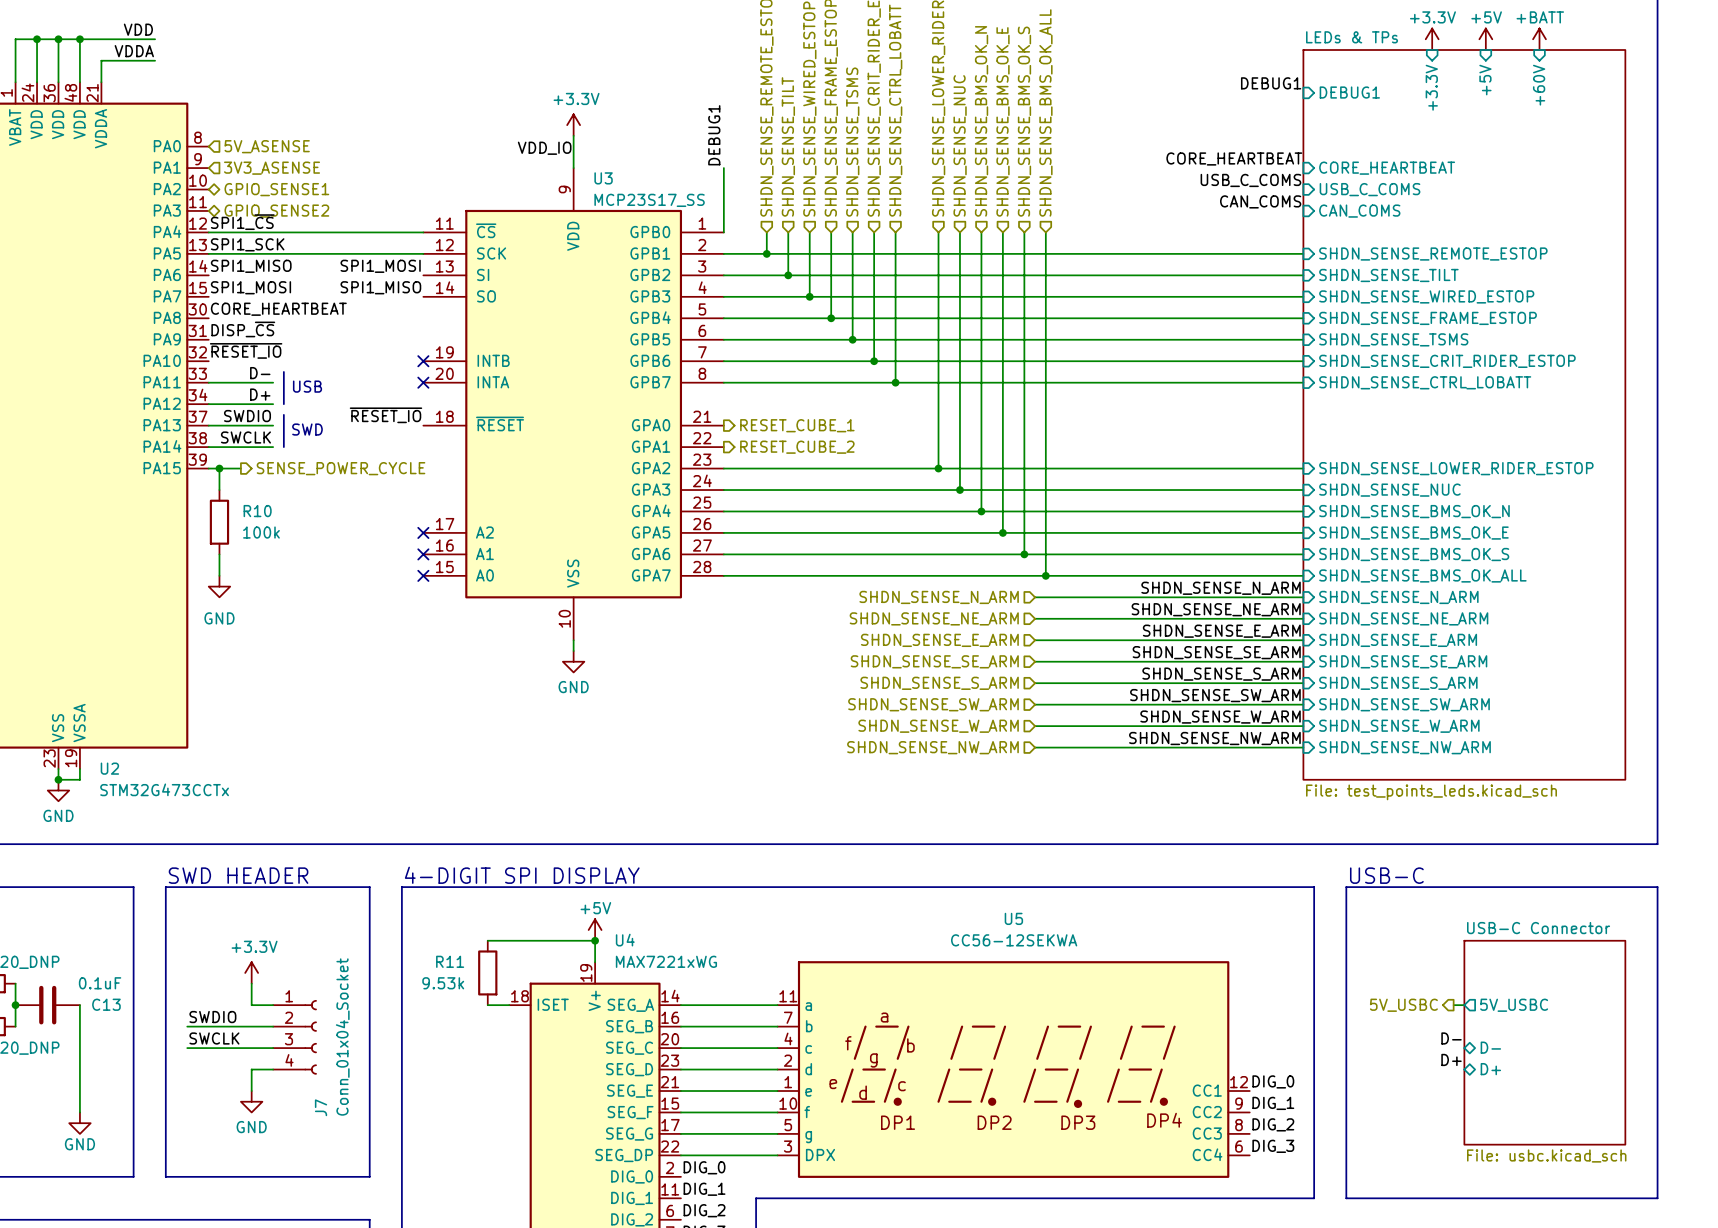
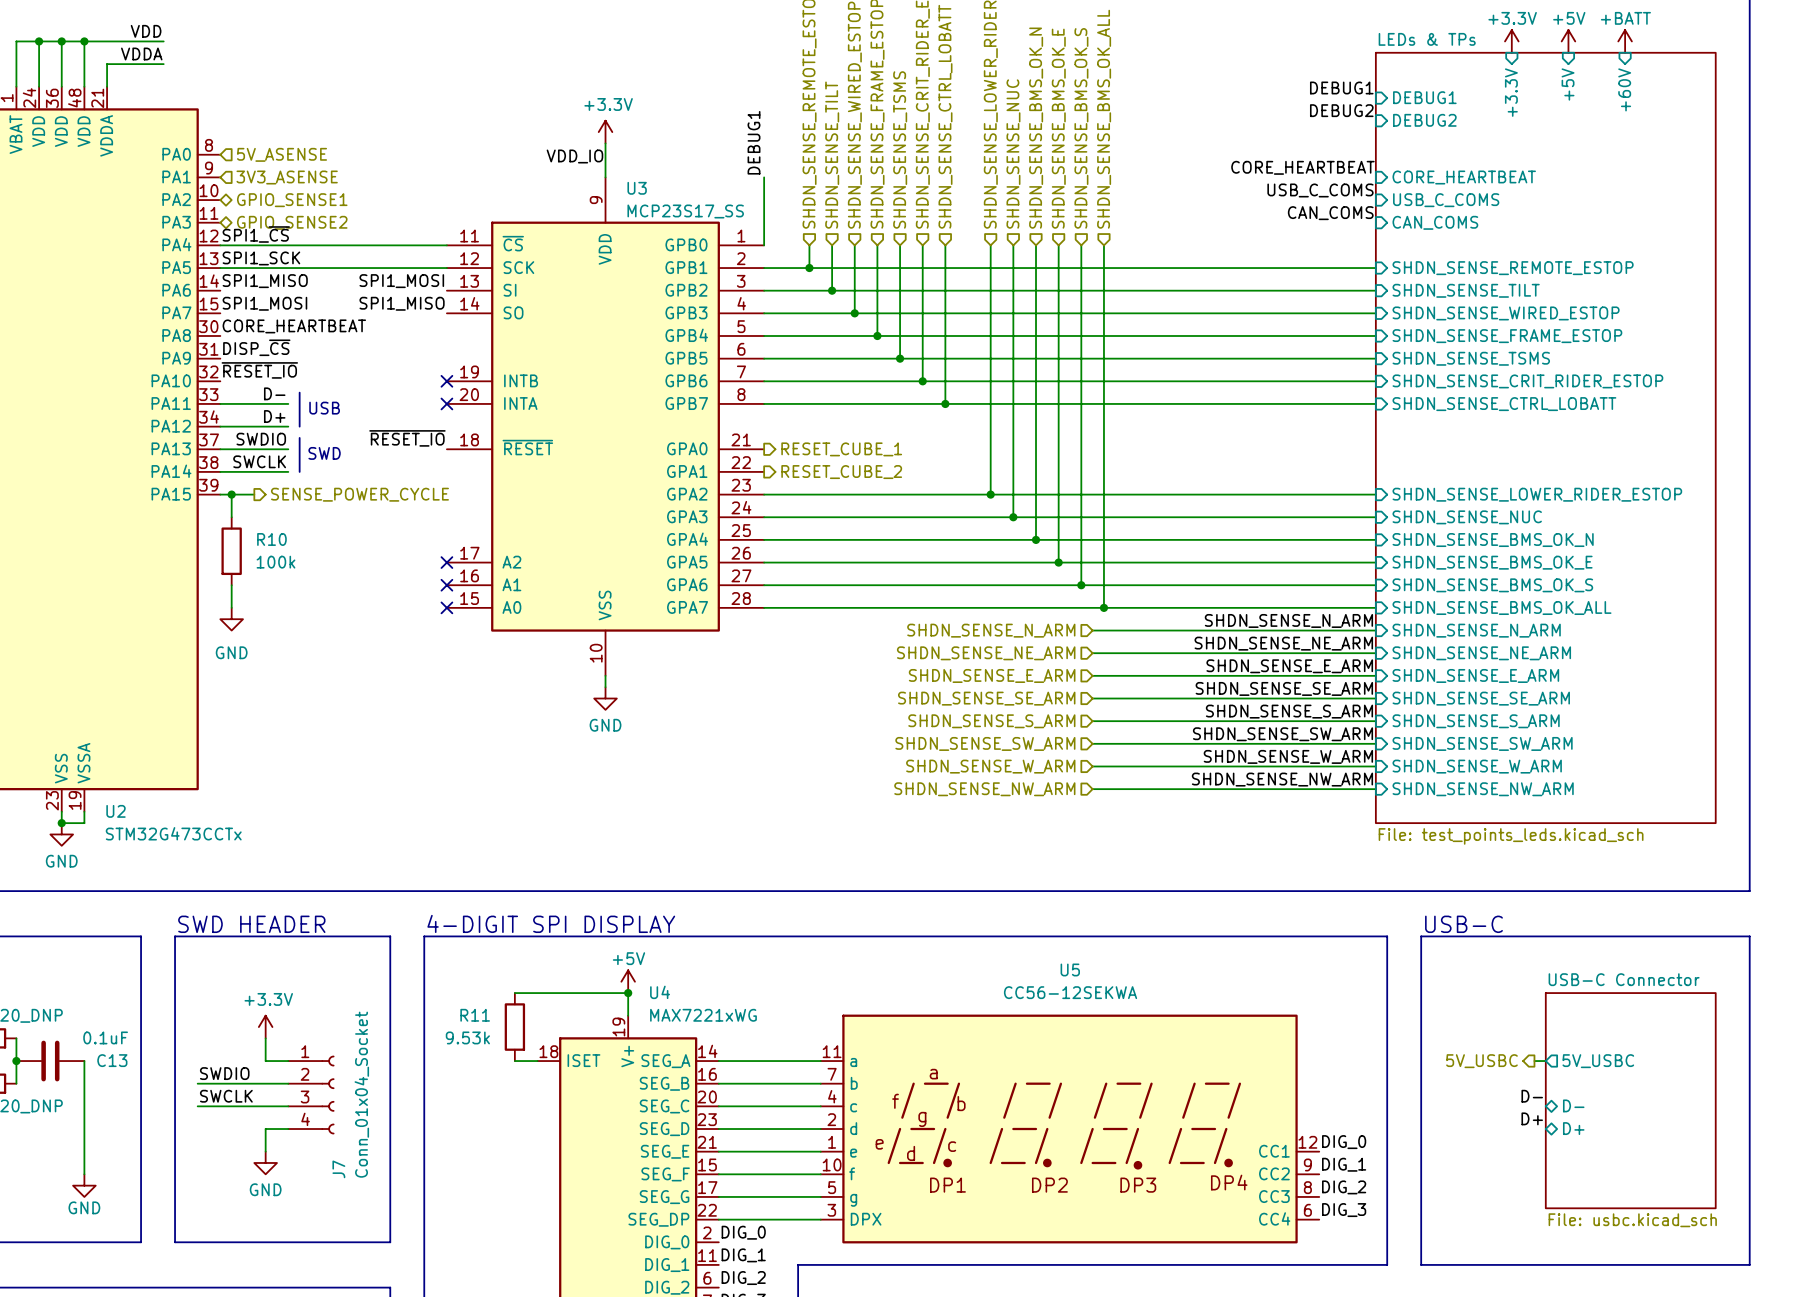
label: none -> DEBUG2 (1341, 110)
sheet pin: none -> DEBUG2 (1424, 120)

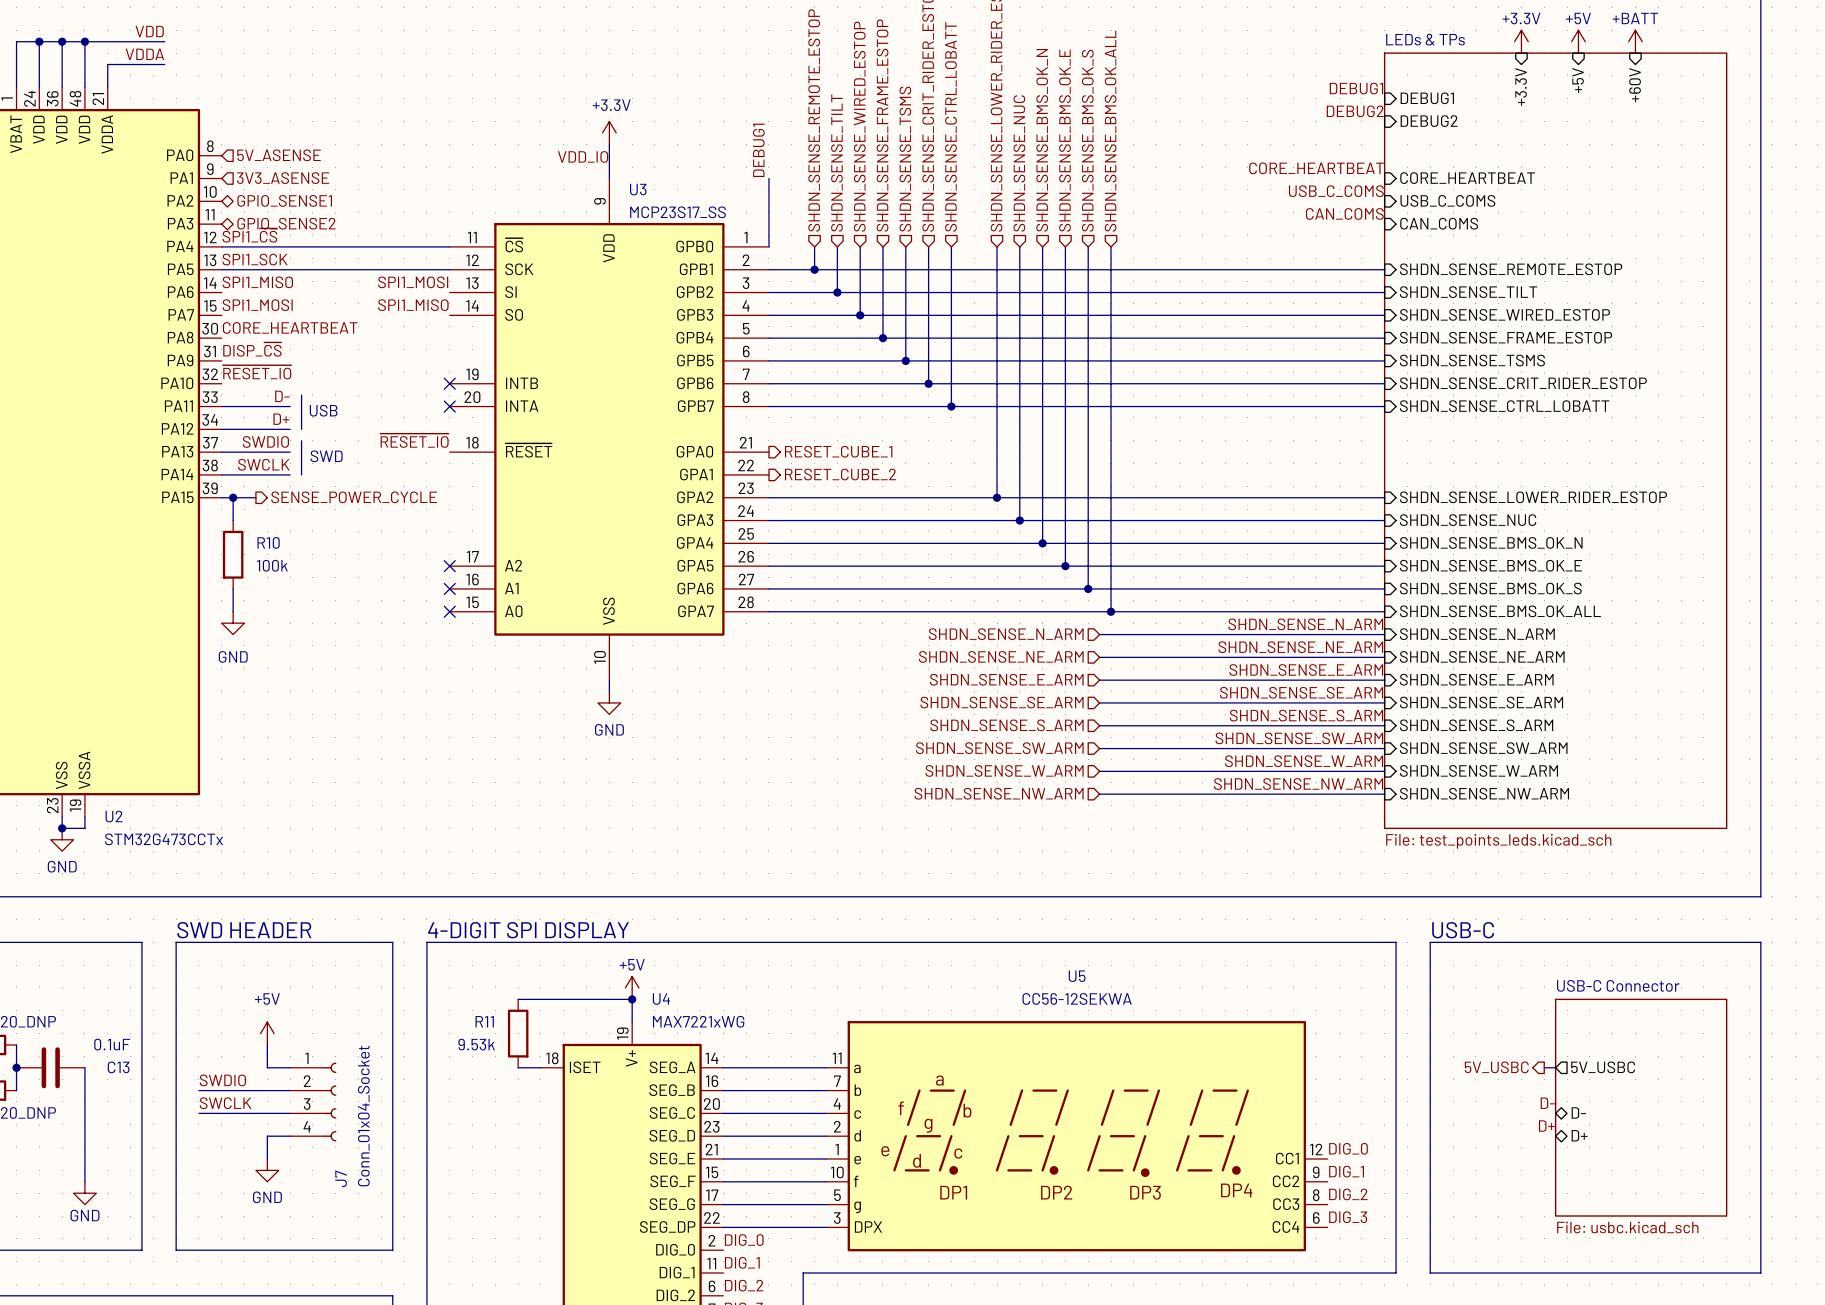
power symbol: +3.3V (265, 1027) -> +5V (267, 1033)

